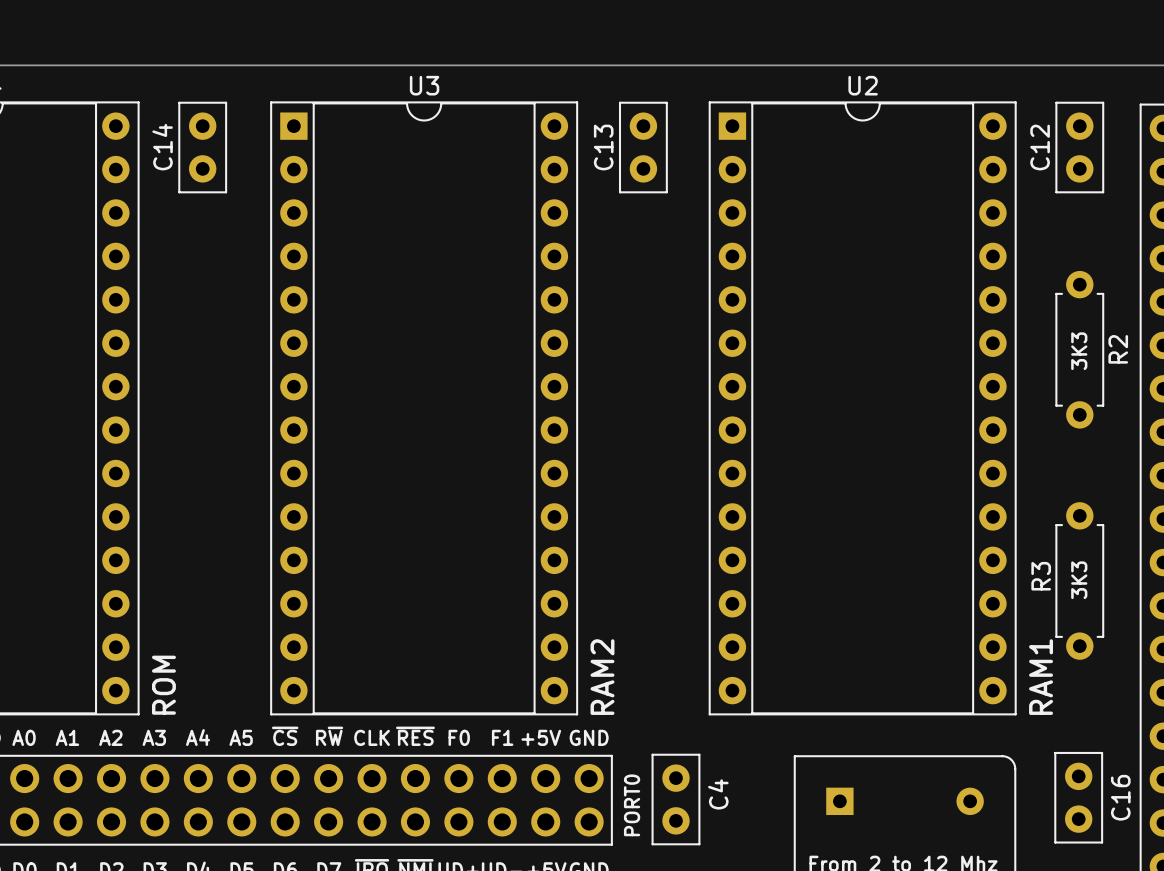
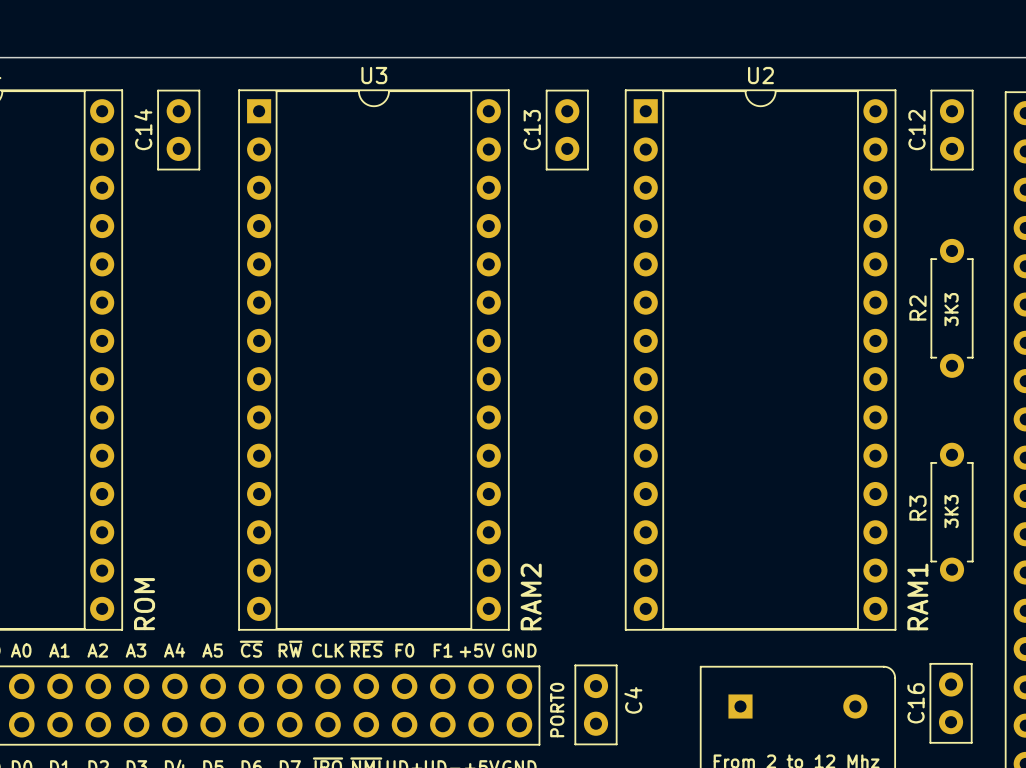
R2 name position: R2 (1118, 349) -> R2 (917, 308)
C16 name position: C16 (1120, 797) -> C16 (916, 703)

